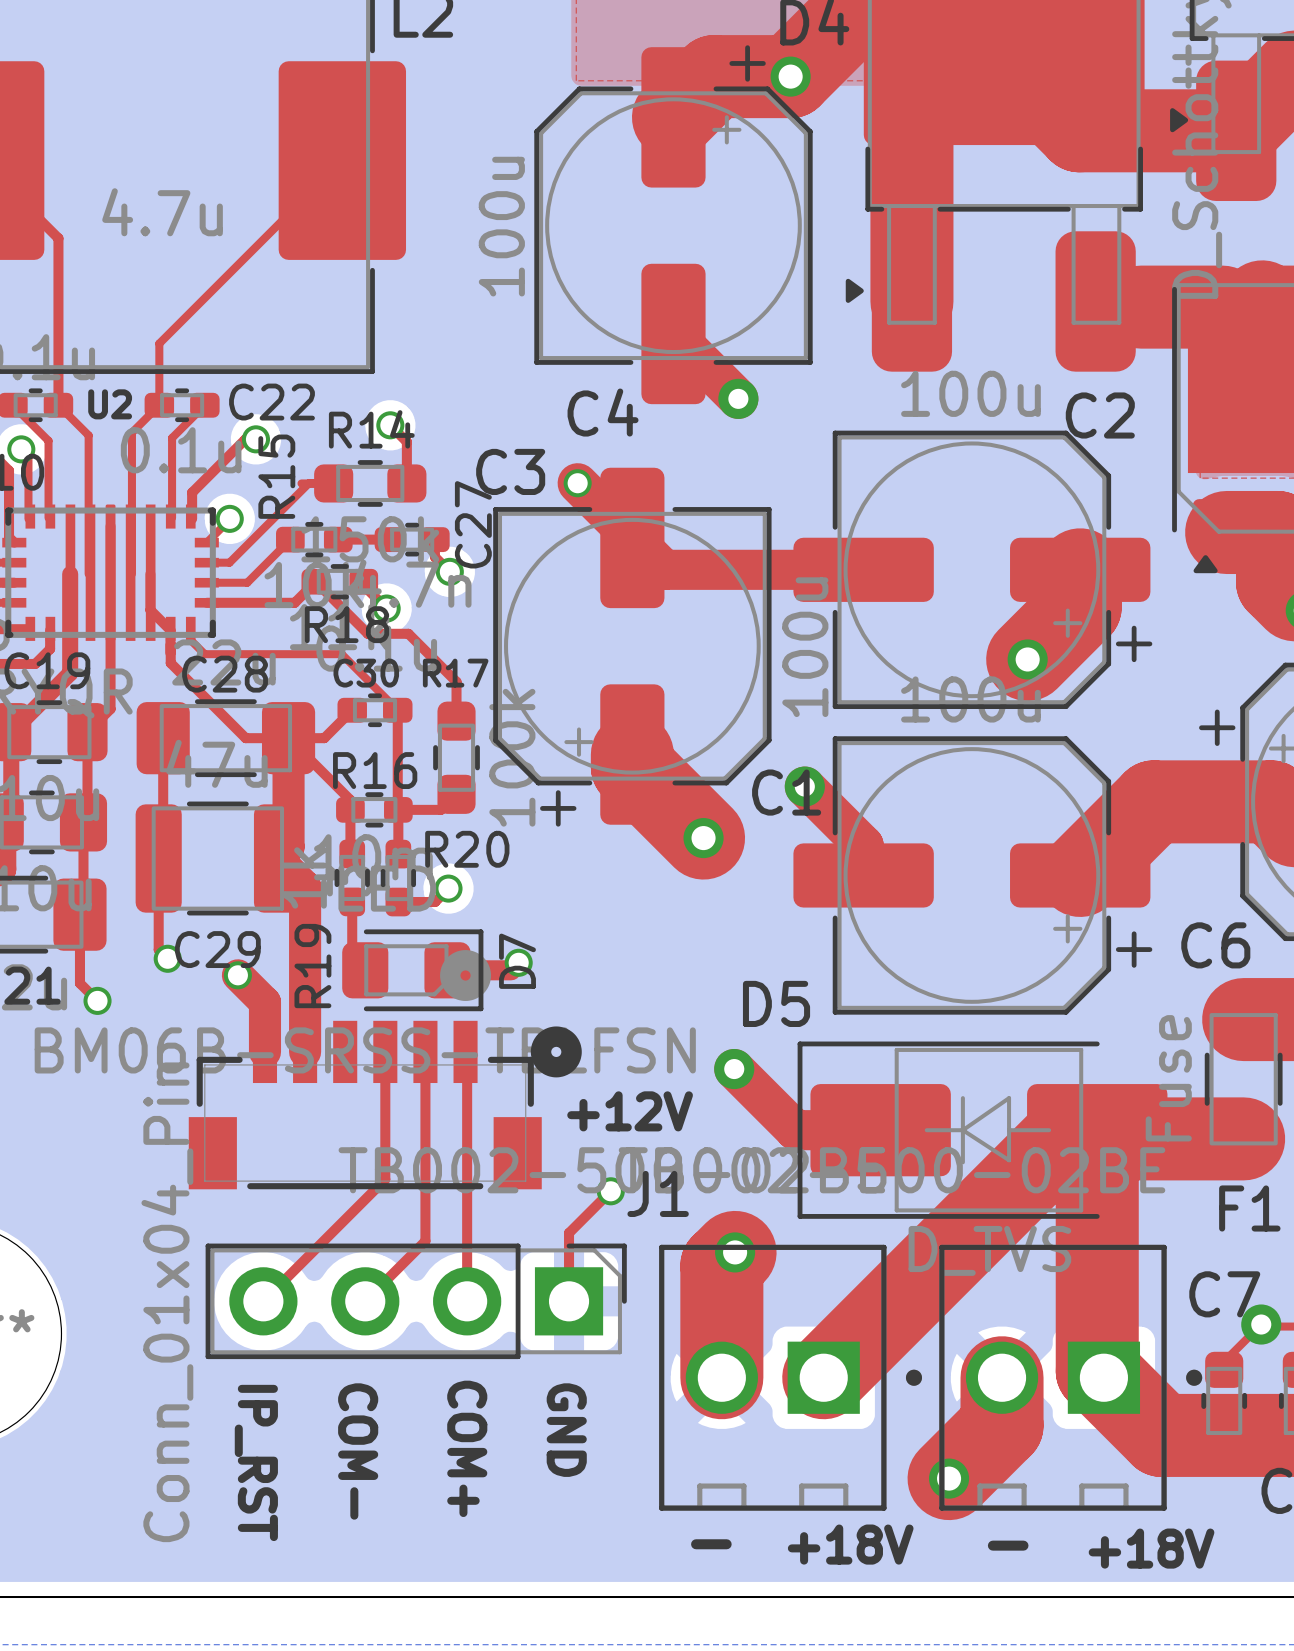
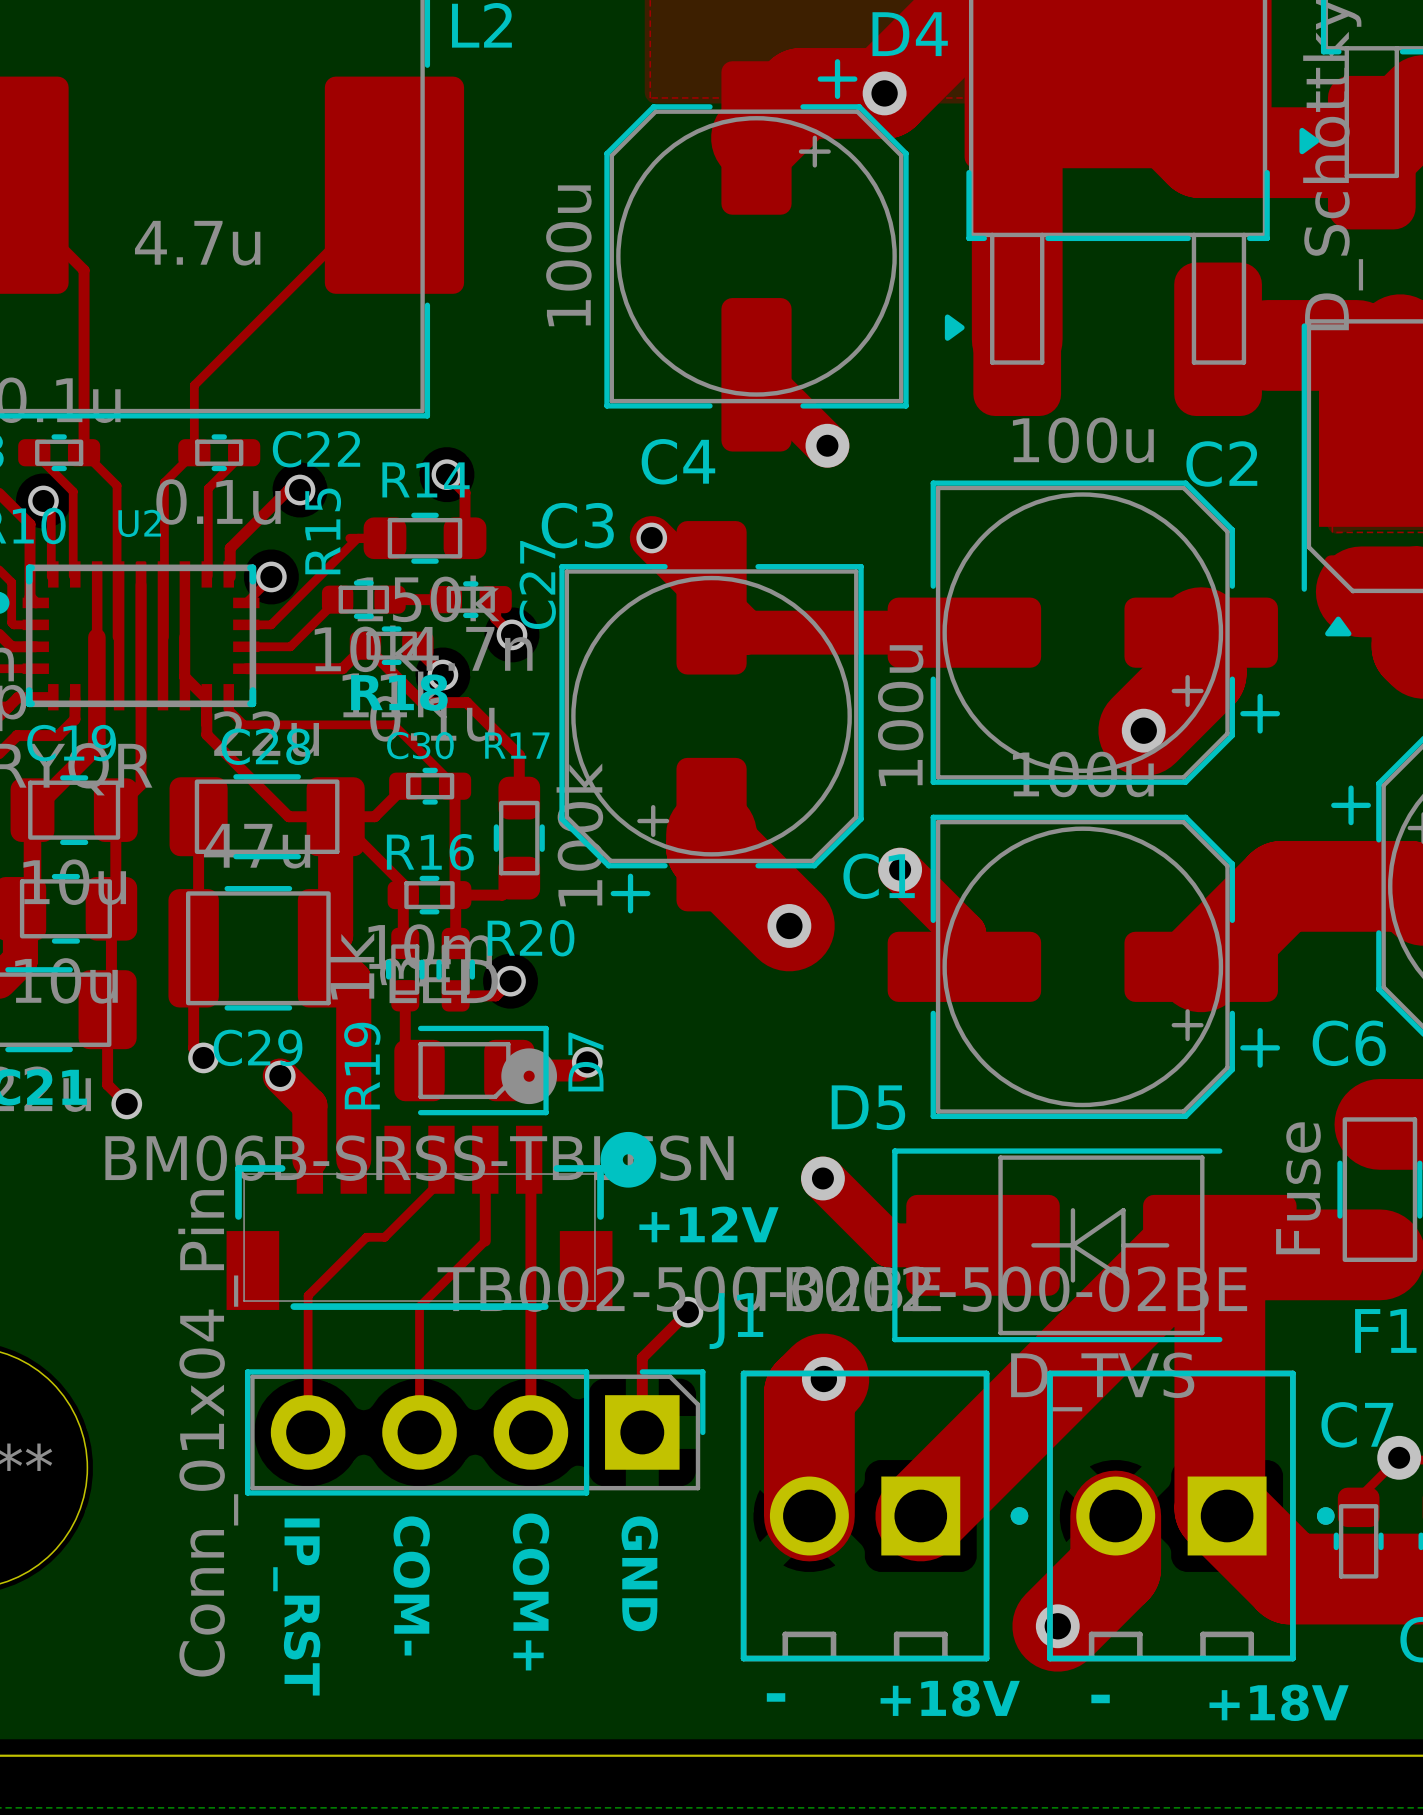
part text position: U2 (110, 404) -> U2 (139, 523)
top track: (385, 1070) (385, 1179) (263, 1301) -> (441, 1180) (384, 1237) (366, 1237) (308, 1295) (308, 1432)
top track: (425, 1126) (425, 1241) (365, 1301) -> (485, 1241) (419, 1306) (419, 1432)

